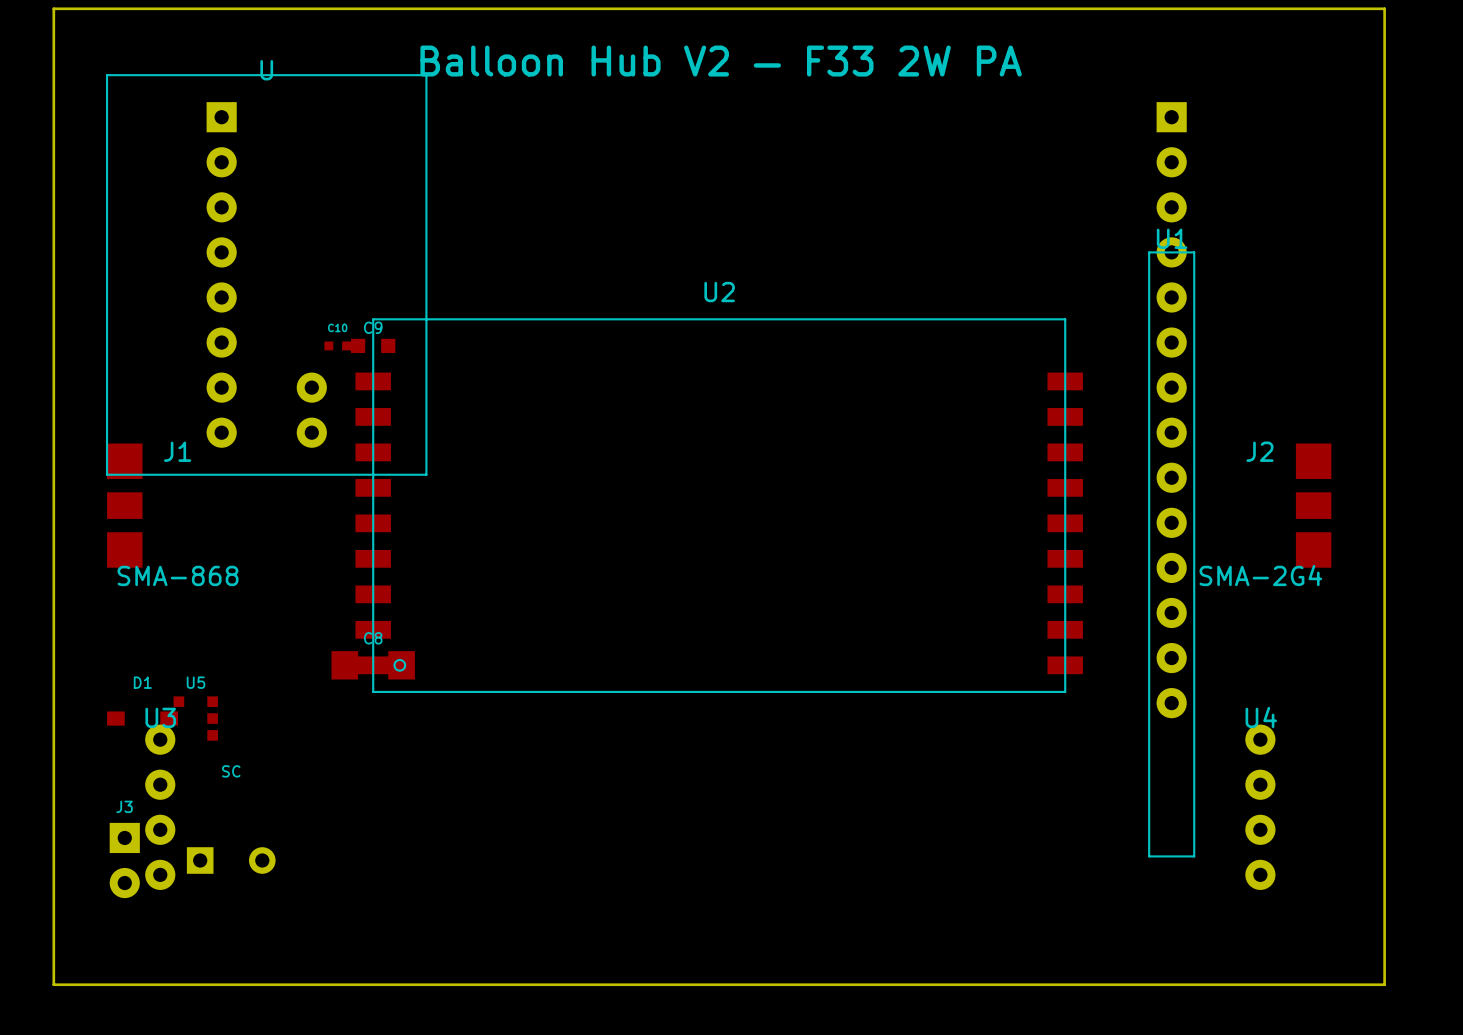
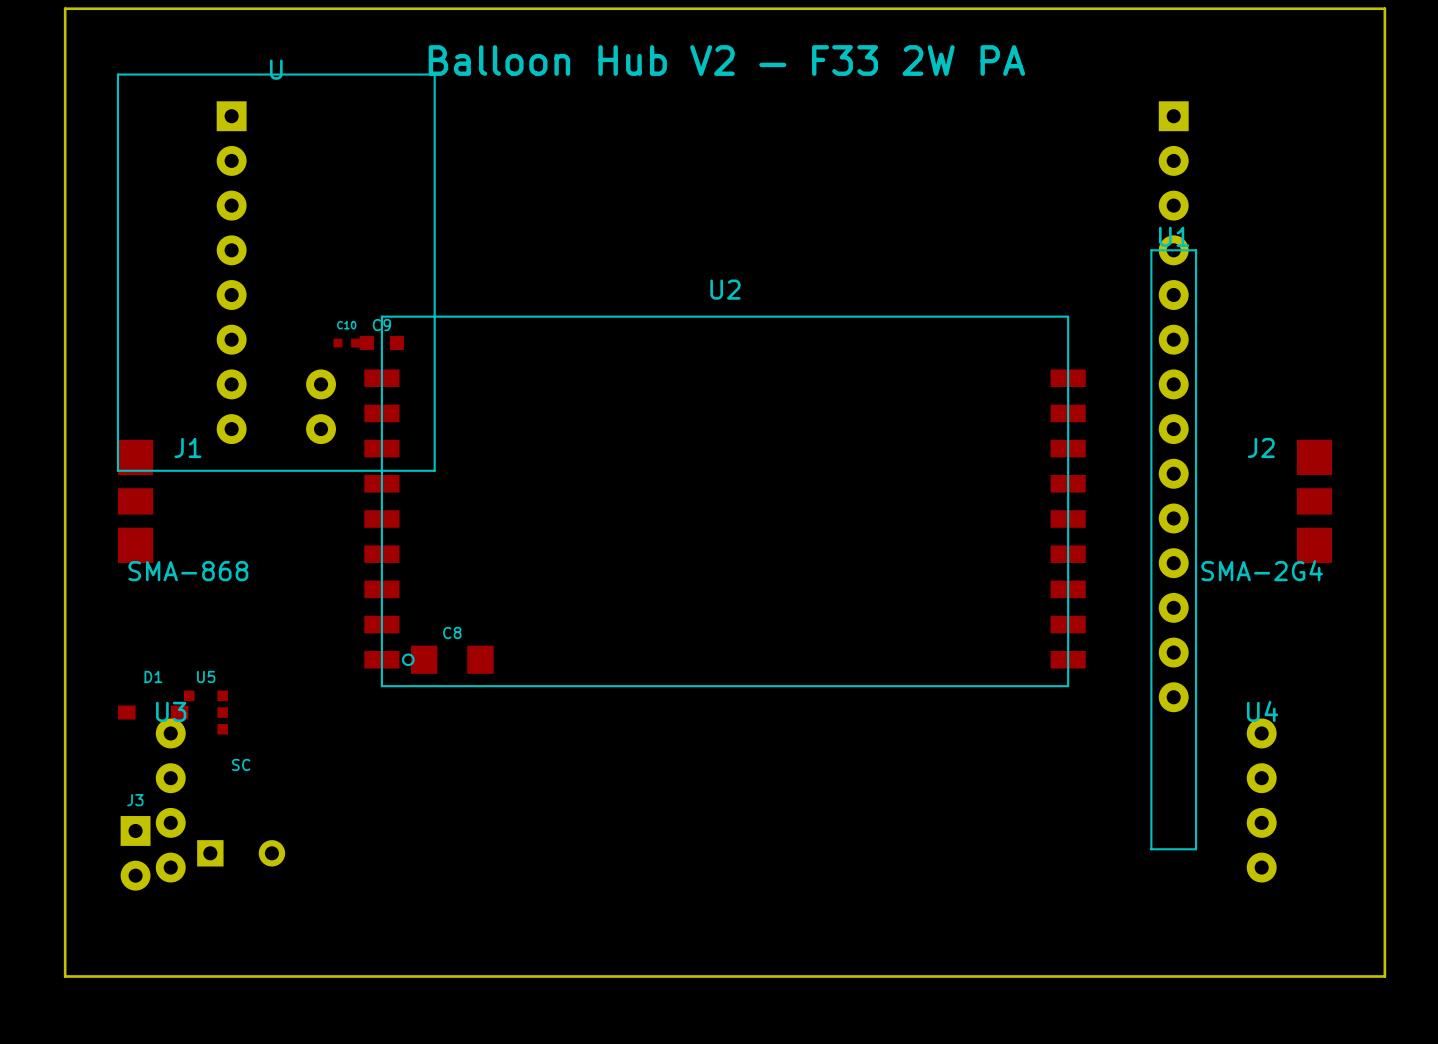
C8 position: (373, 665) -> (452, 659)

